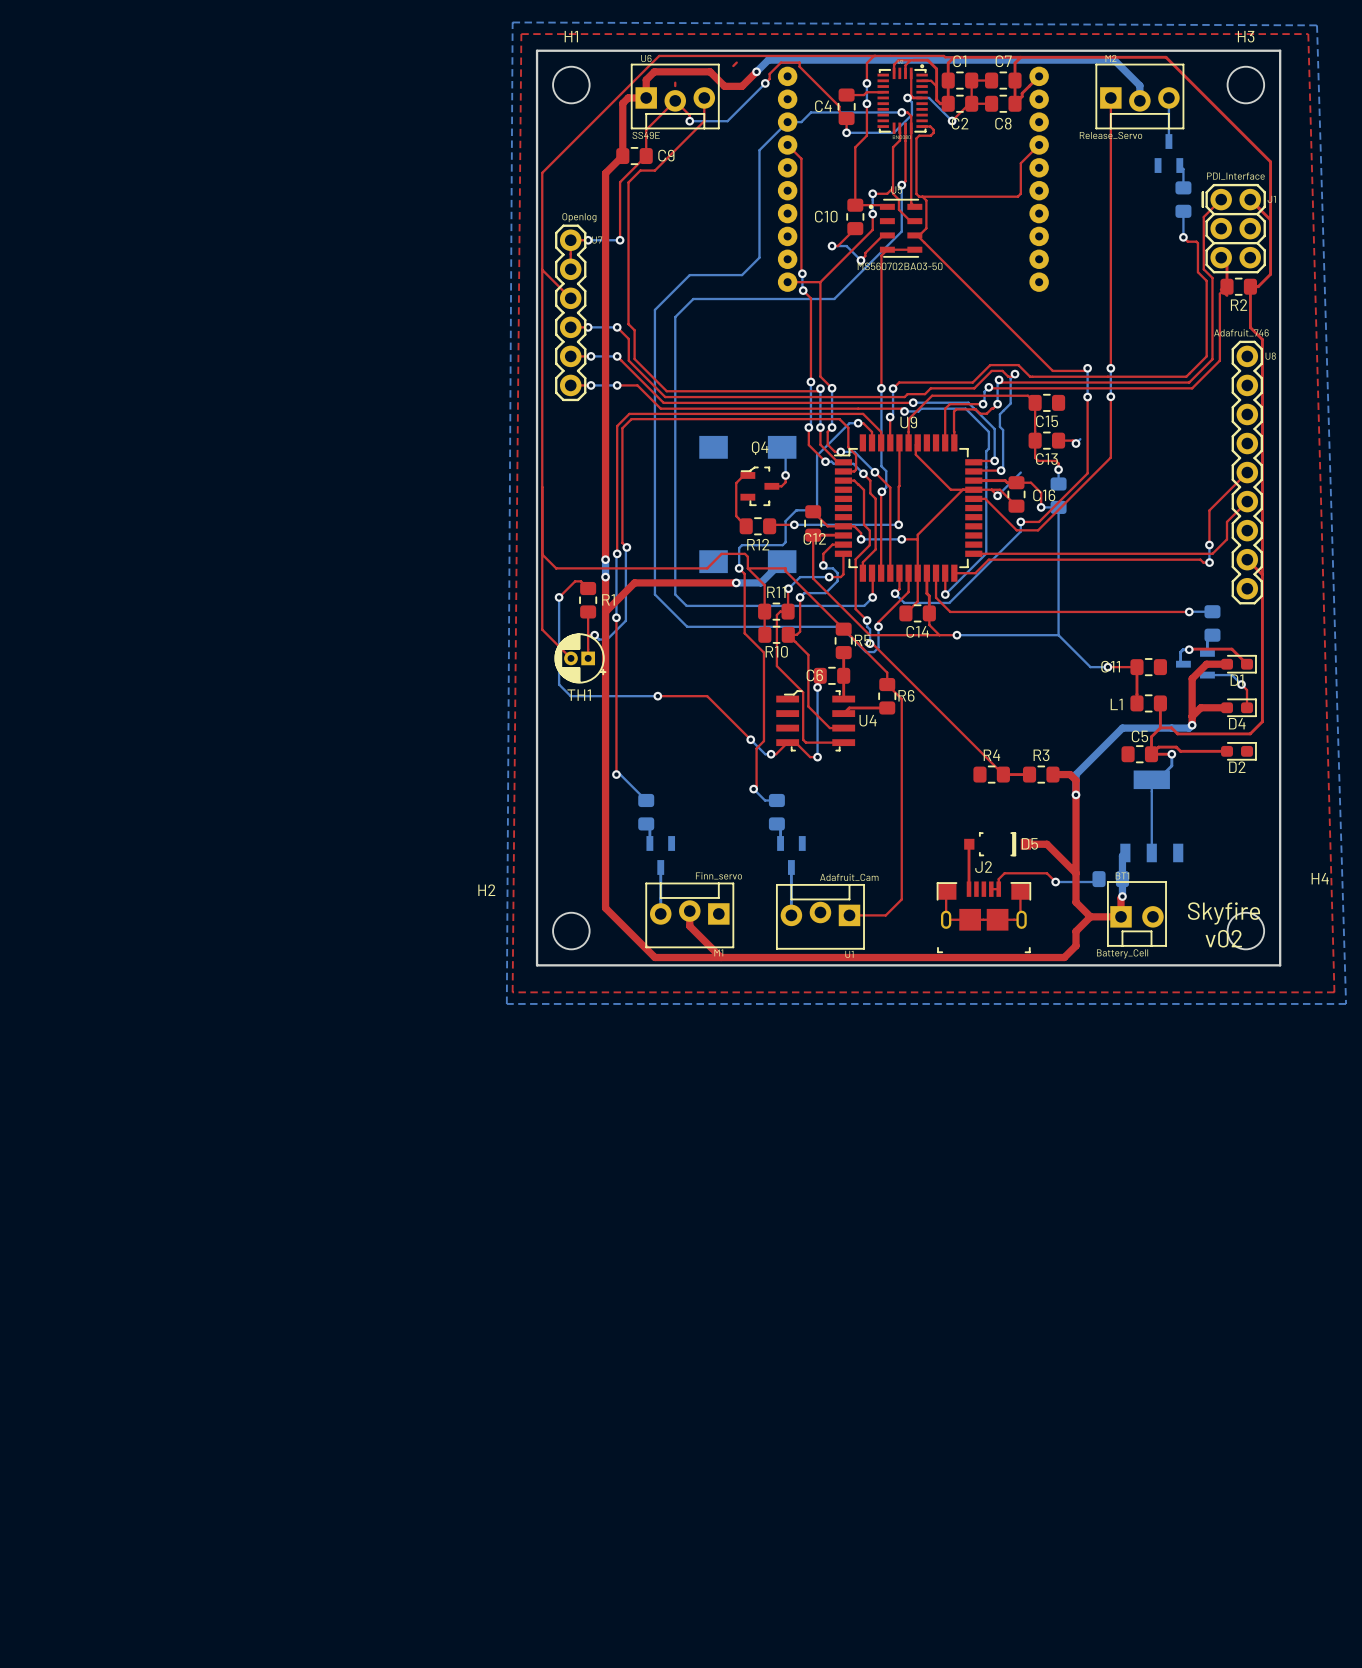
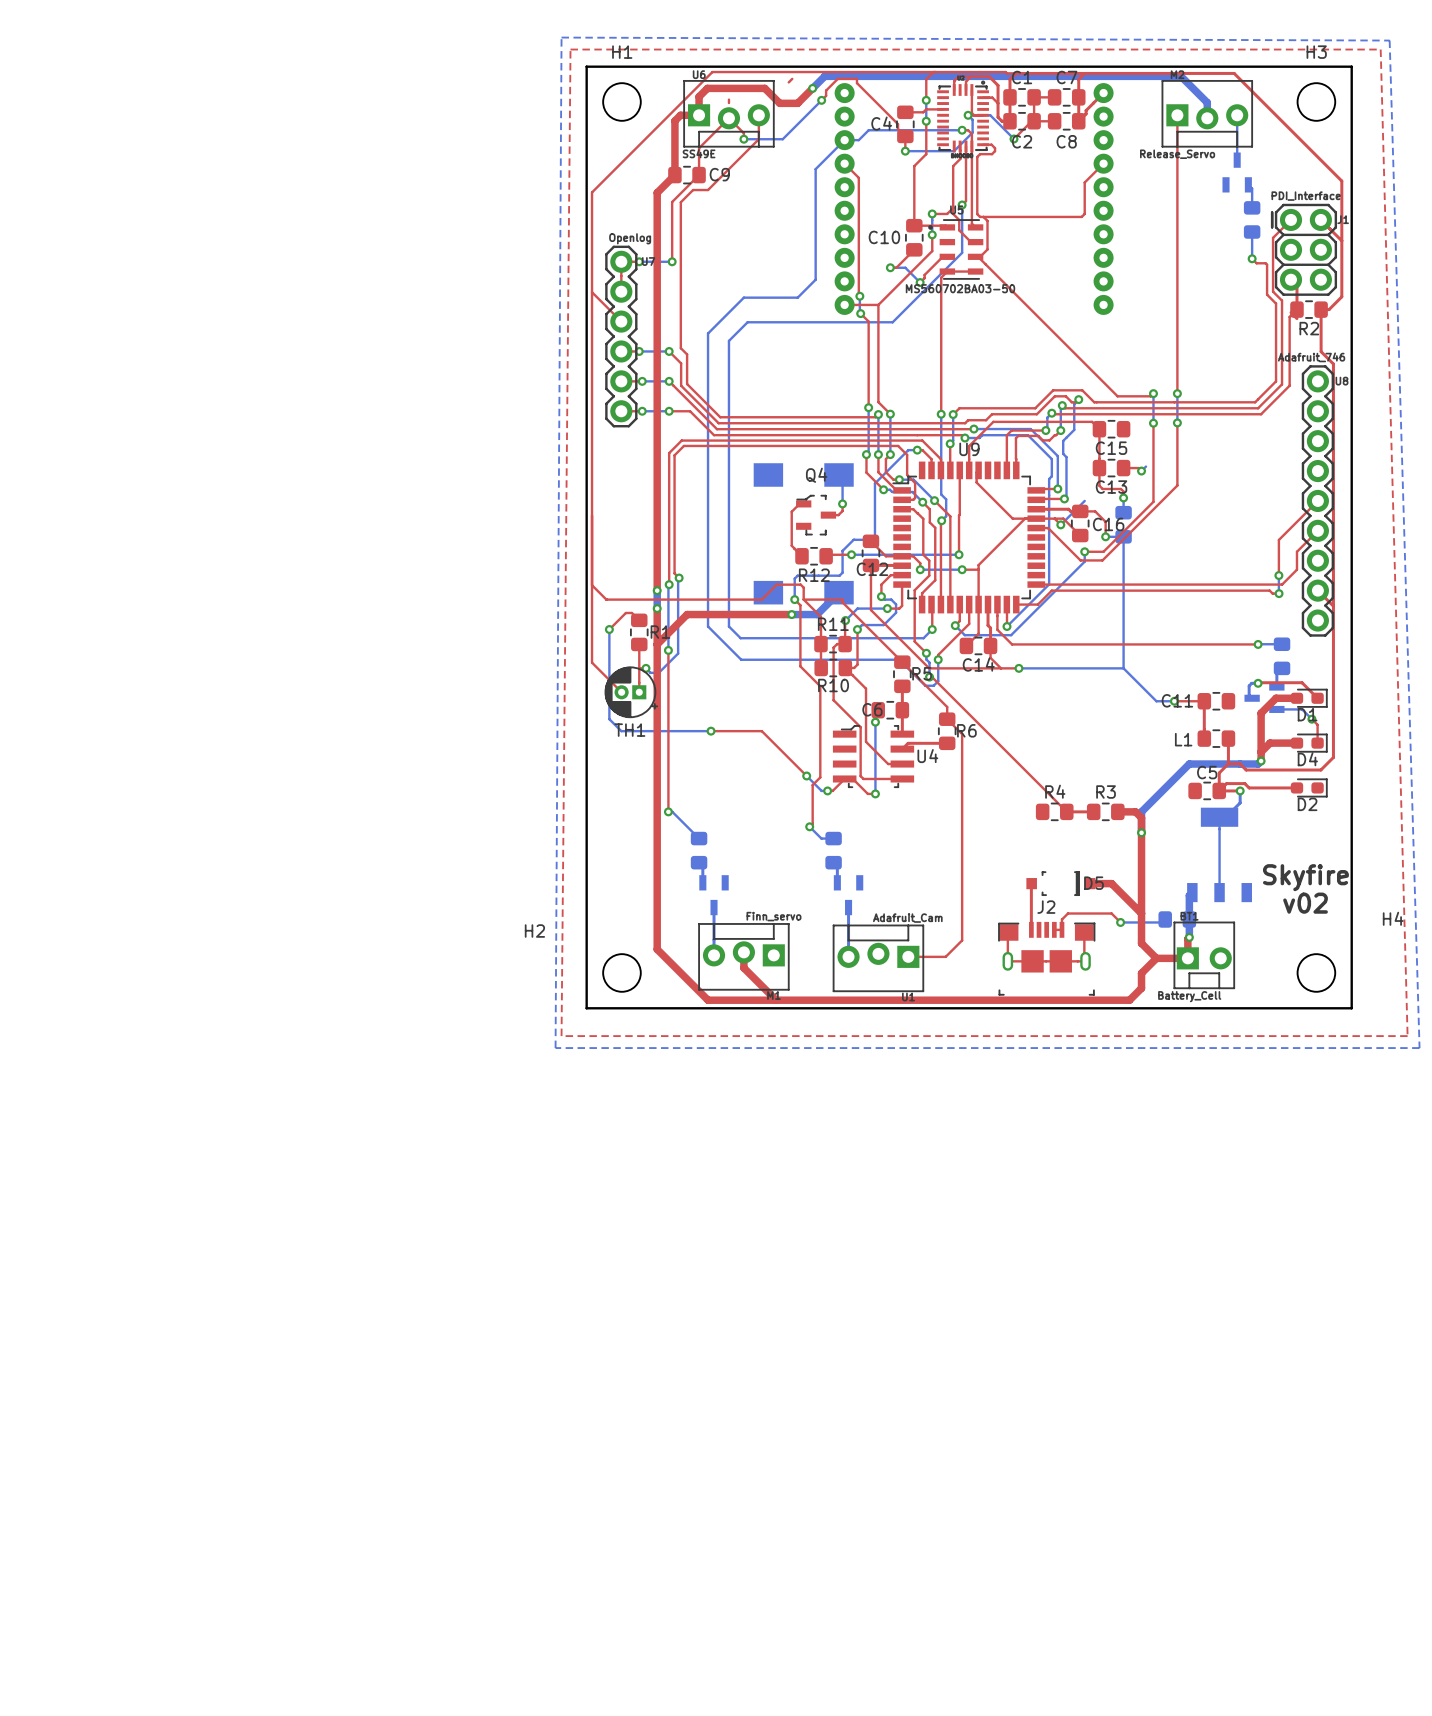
text position: Skyfire (1223, 913) -> Skyfire (1305, 877)
text position: v02 (1223, 938) -> v02 (1305, 903)

